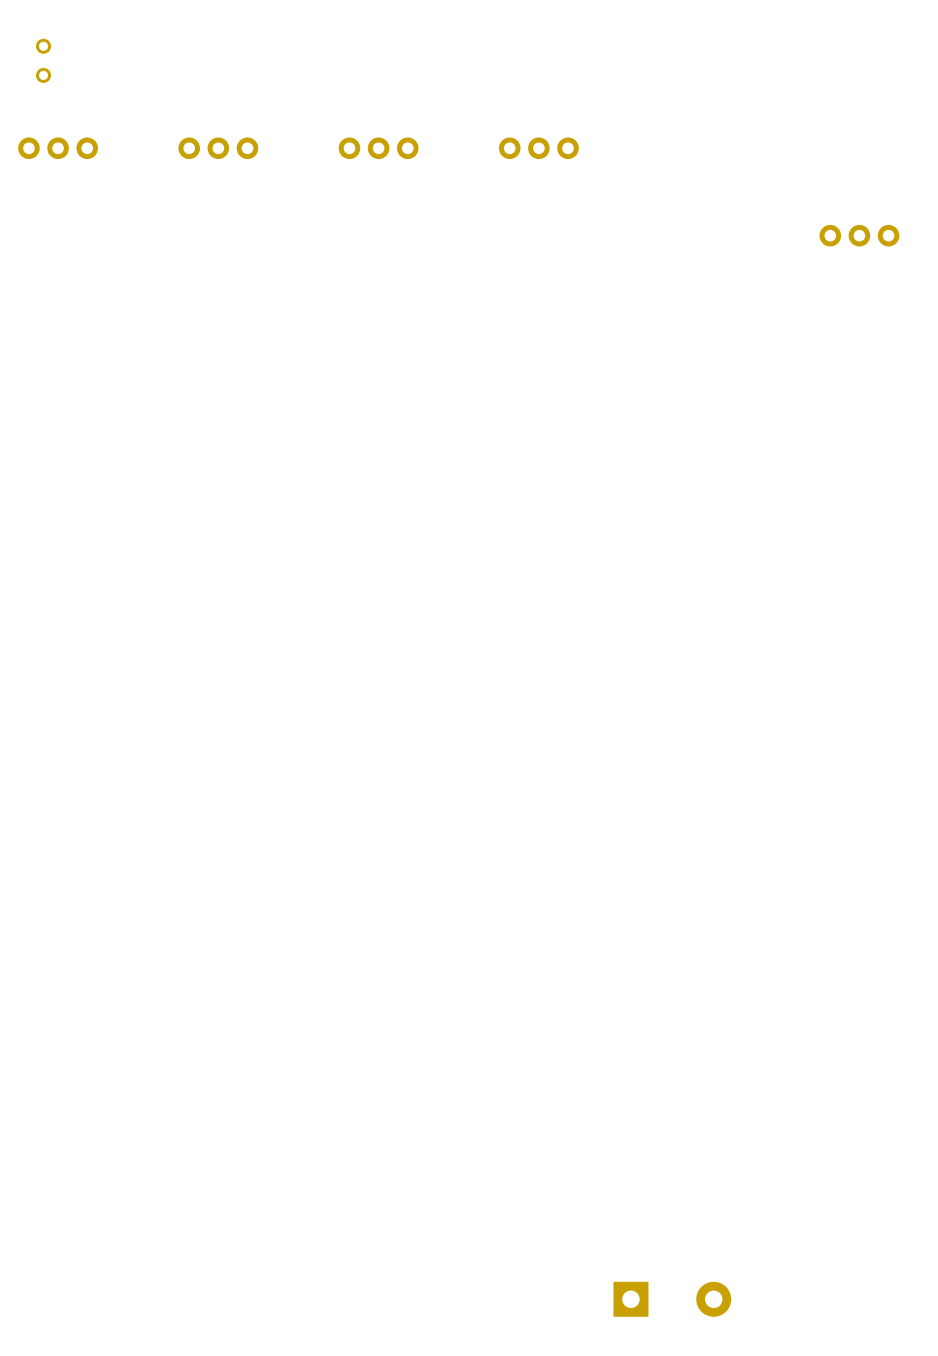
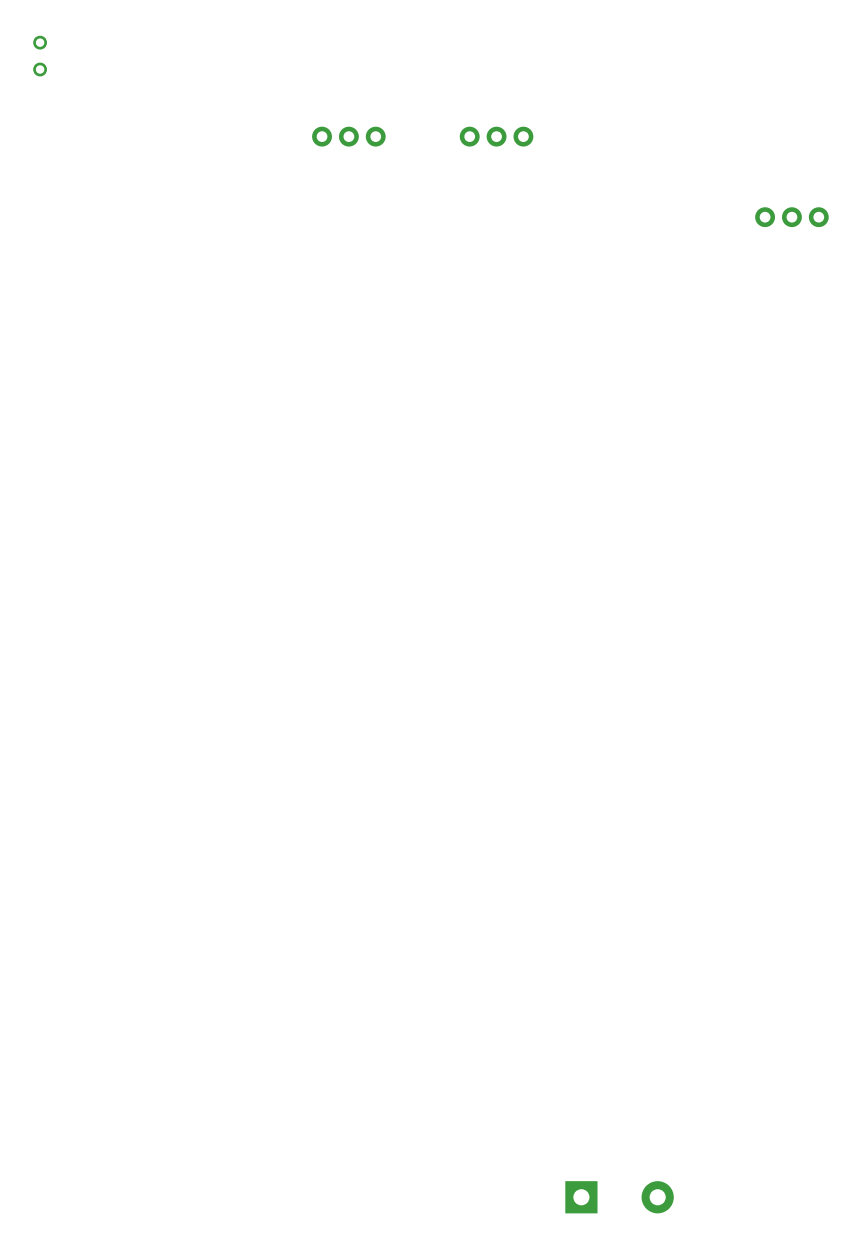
part: (58, 148) -> none
part: (218, 148) -> none

